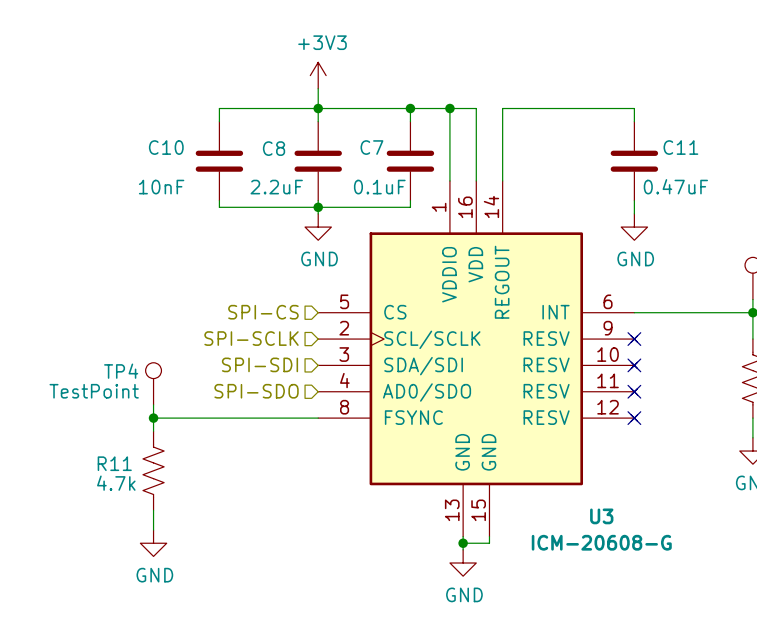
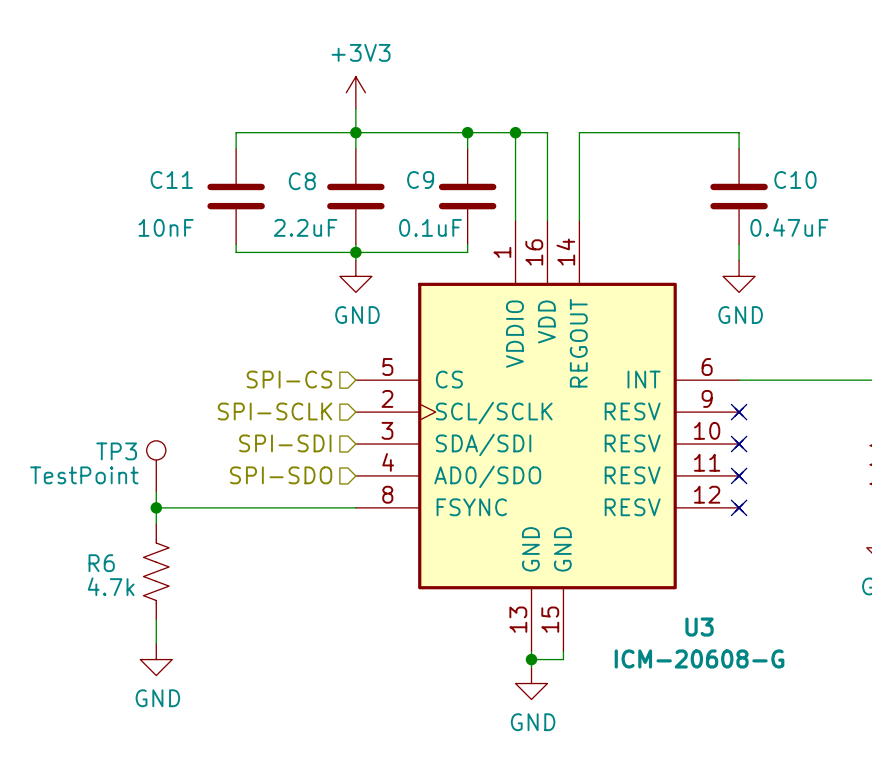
C10 name: C10 (166, 147) -> C11 (171, 179)
C7 name: C7 (371, 147) -> C9 (420, 179)
C11 name: C11 (680, 147) -> C10 (795, 179)
TP4 name: TP4 (121, 371) -> TP3 (116, 451)
R11 name: R11 (114, 463) -> R6 (101, 563)

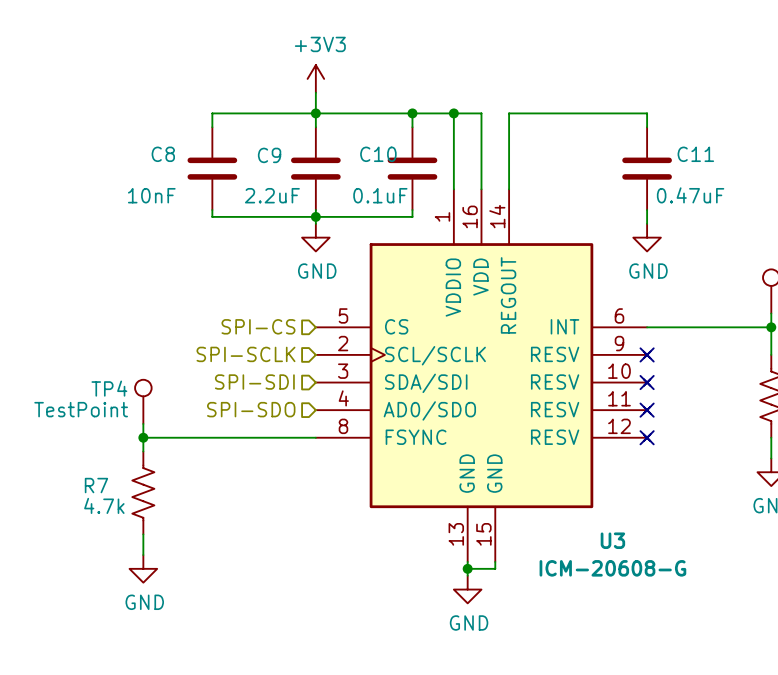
C11 name: C11 (171, 179) -> C8 (163, 154)
C9 name: C9 (420, 179) -> C10 (378, 154)
C10 name: C10 (795, 179) -> C11 (695, 154)
C8 name: C8 (302, 181) -> C9 (269, 155)
TP3 name: TP3 (116, 451) -> TP4 (109, 388)
R6 name: R6 (101, 563) -> R7 (96, 485)

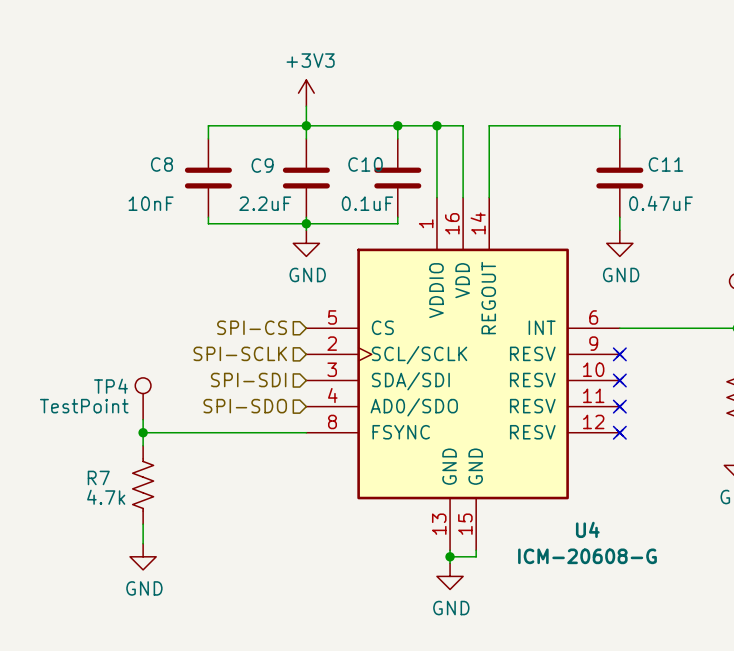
U3 name: U3 (612, 540) -> U4 (587, 529)

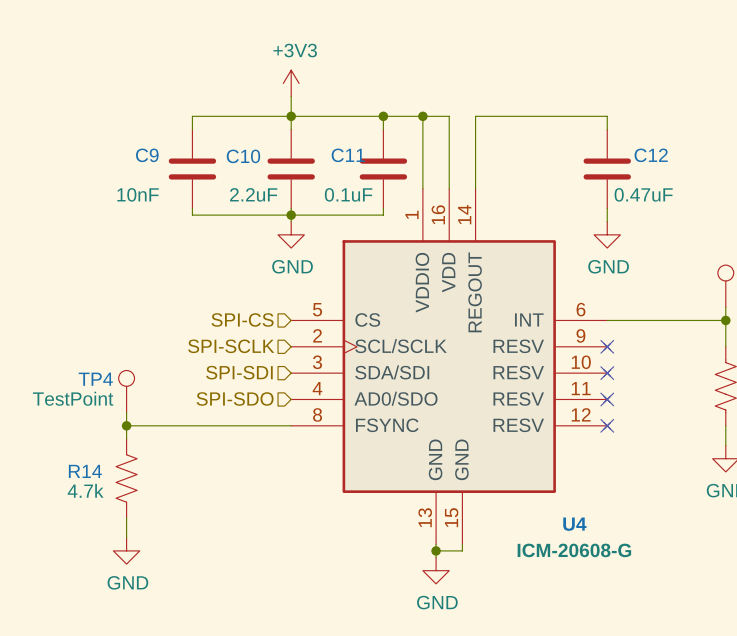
C8 name: C8 (161, 164) -> C9 (147, 155)
C10 name: C10 (365, 164) -> C11 (348, 155)
C11 name: C11 (665, 164) -> C12 (651, 155)
C9 name: C9 (262, 165) -> C10 (243, 156)
R7 name: R7 (98, 477) -> R14 (85, 471)

